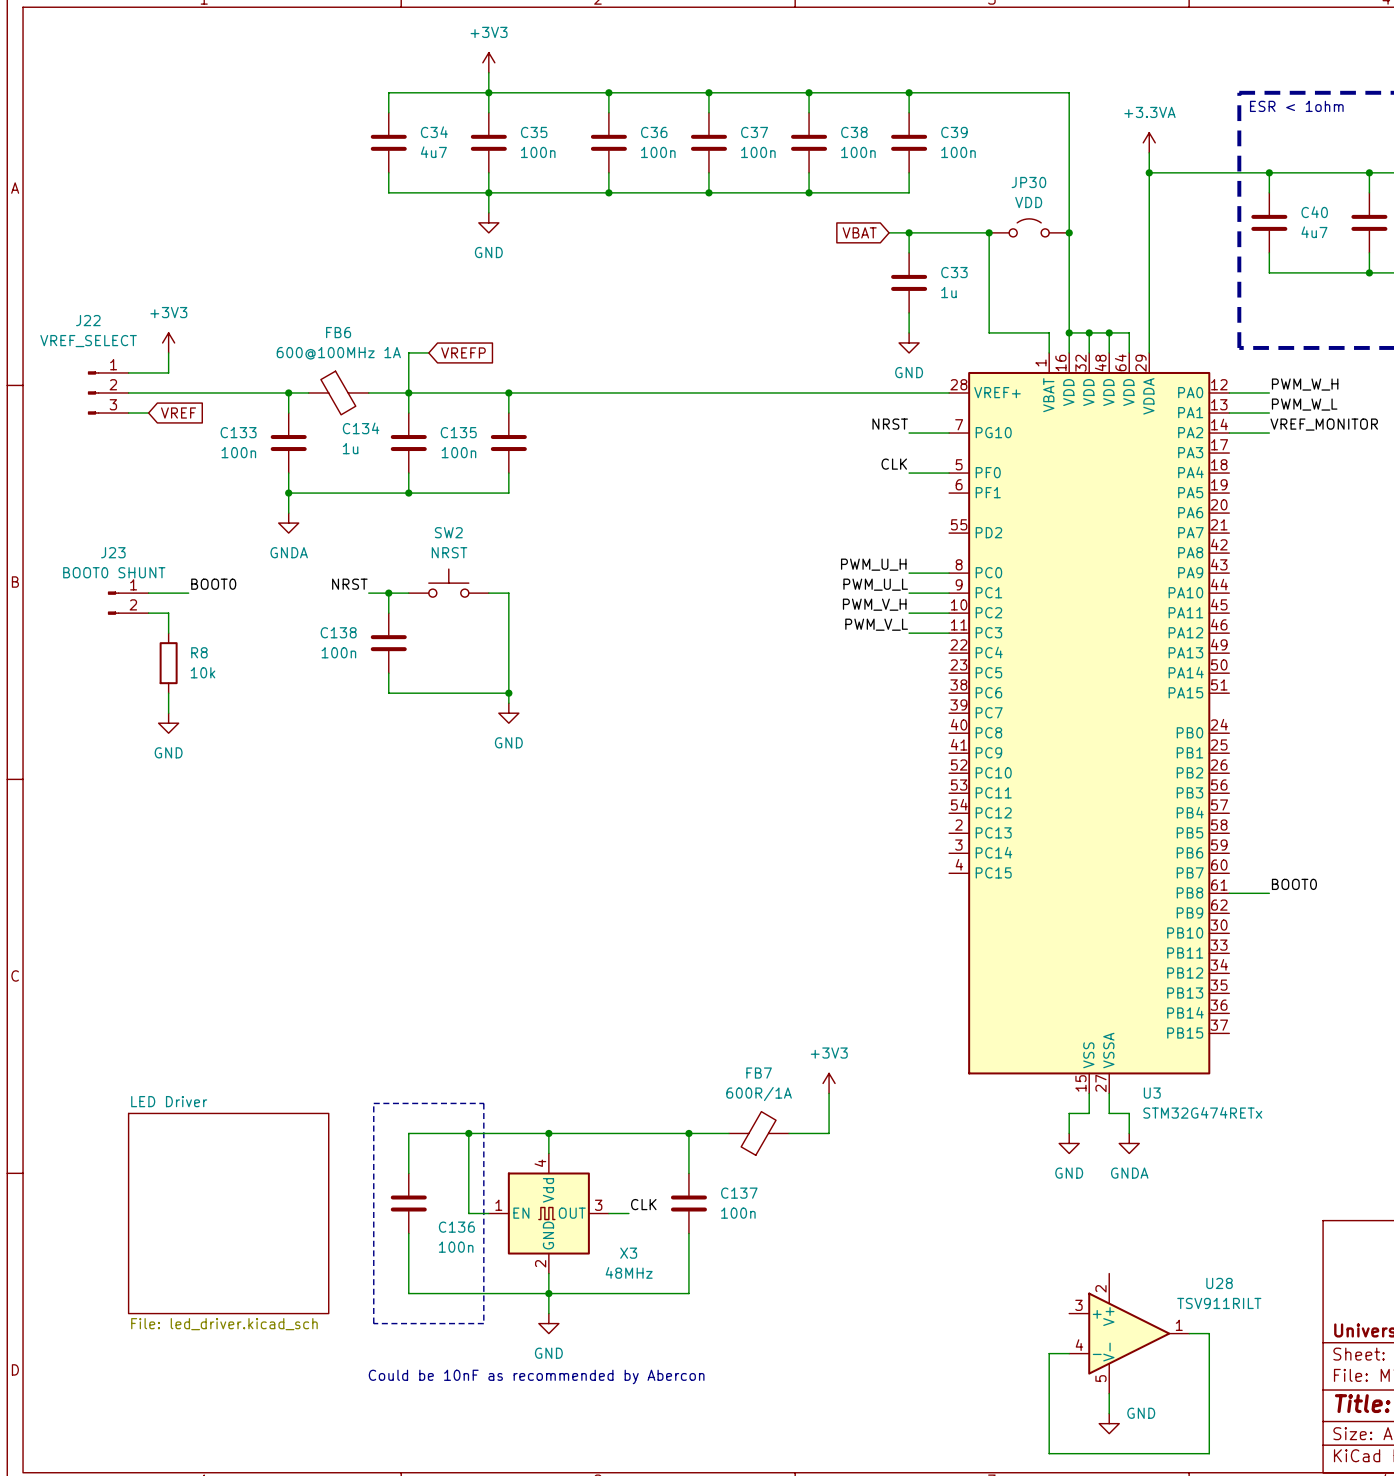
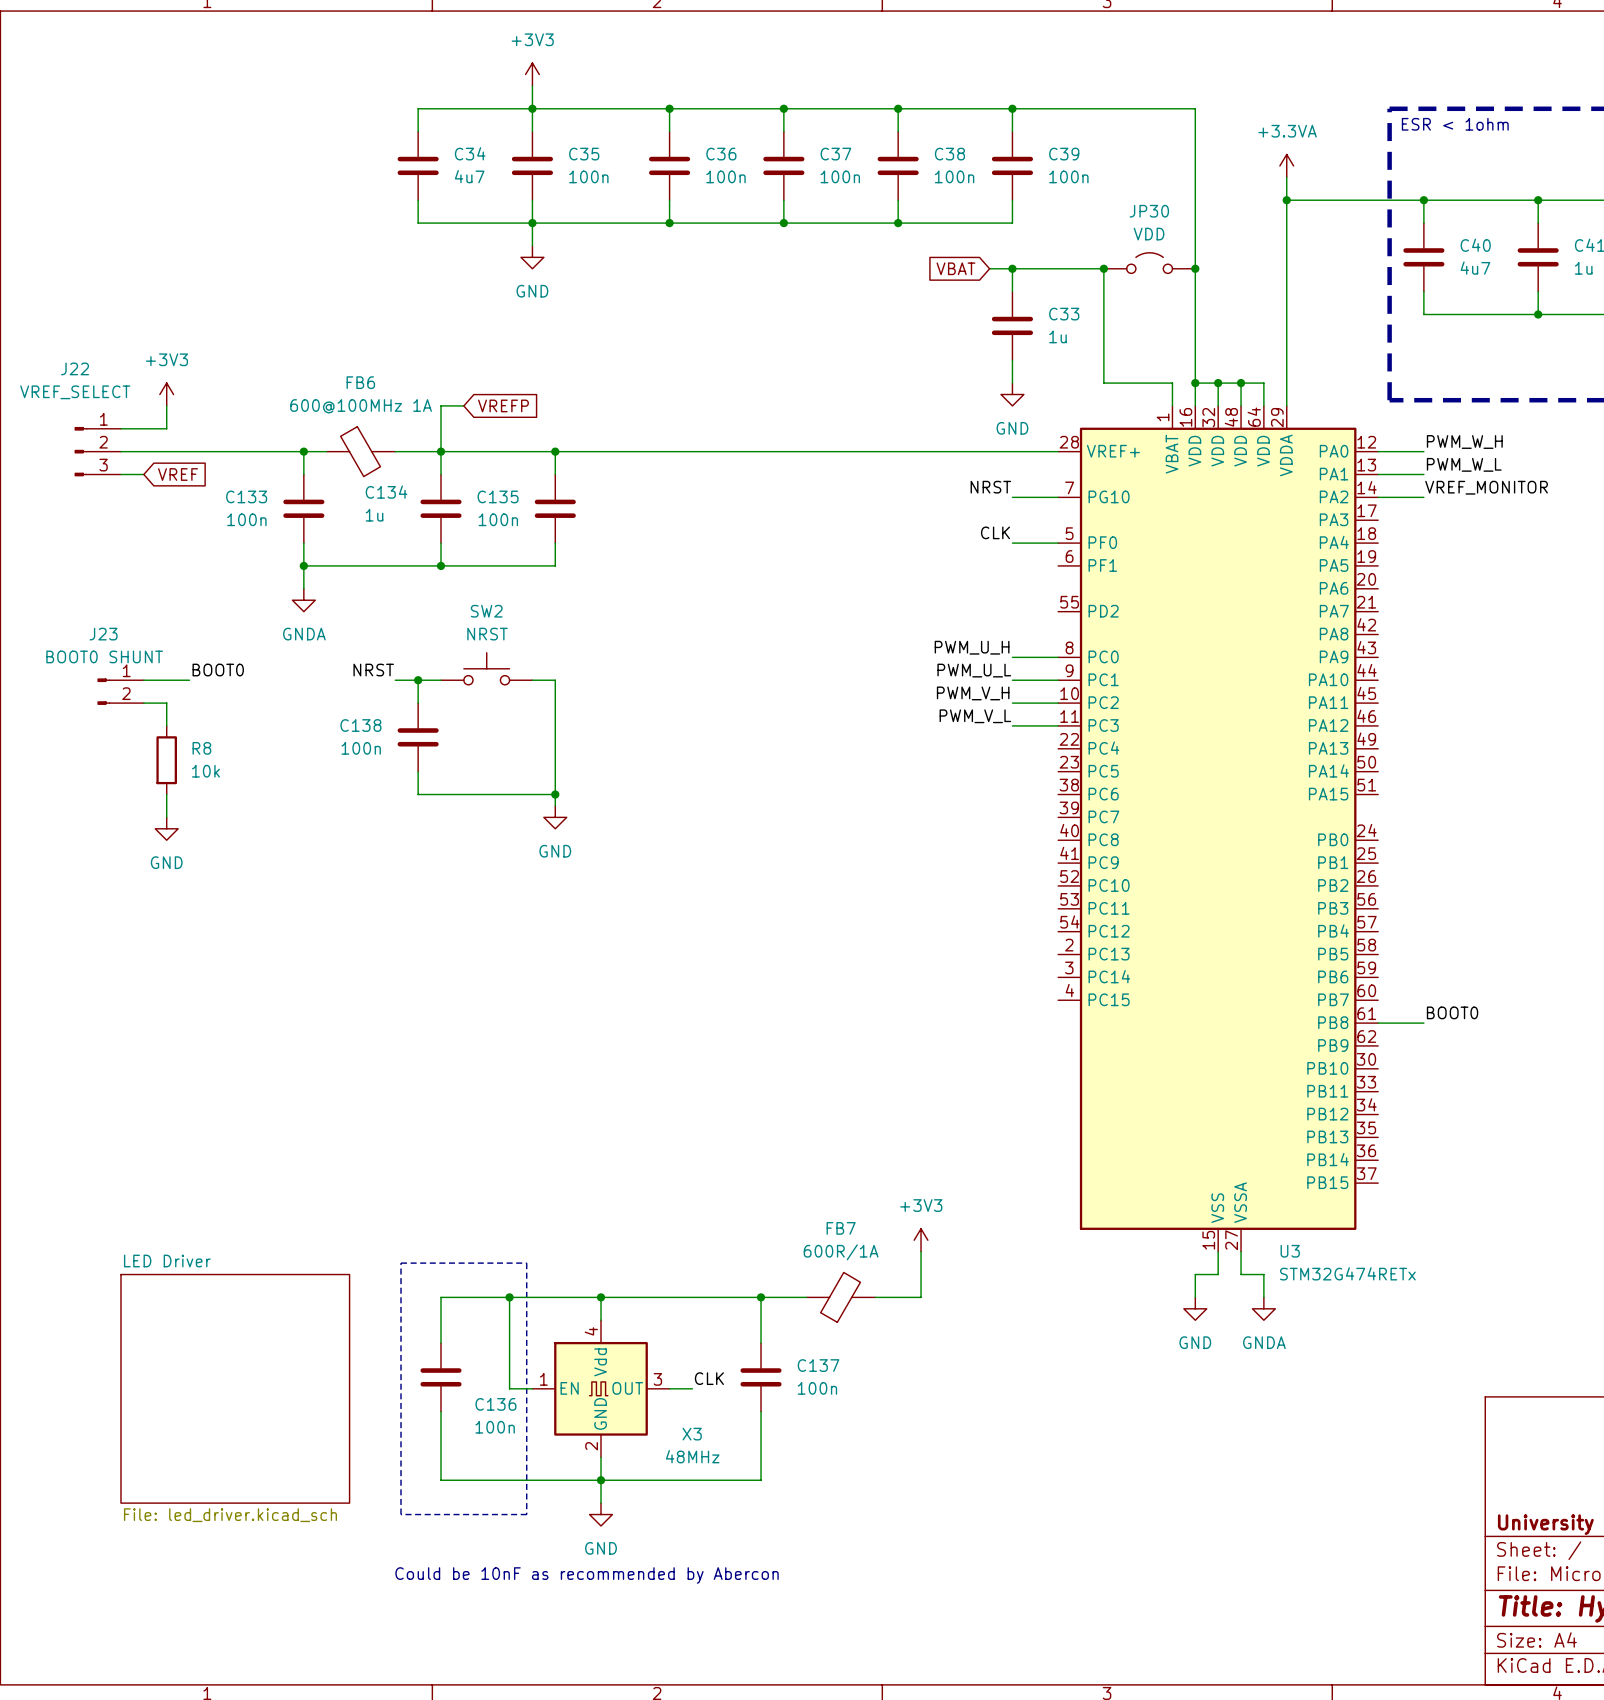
U28: TSV911RILT (1129, 1333) -> none
wire: (1189, 1333) (1209, 1333) (1209, 1453) (1049, 1453) (1049, 1353) (1069, 1353) -> none
wire: (1109, 1393) (1109, 1413) -> none
power symbol: GND (1109, 1423) -> none

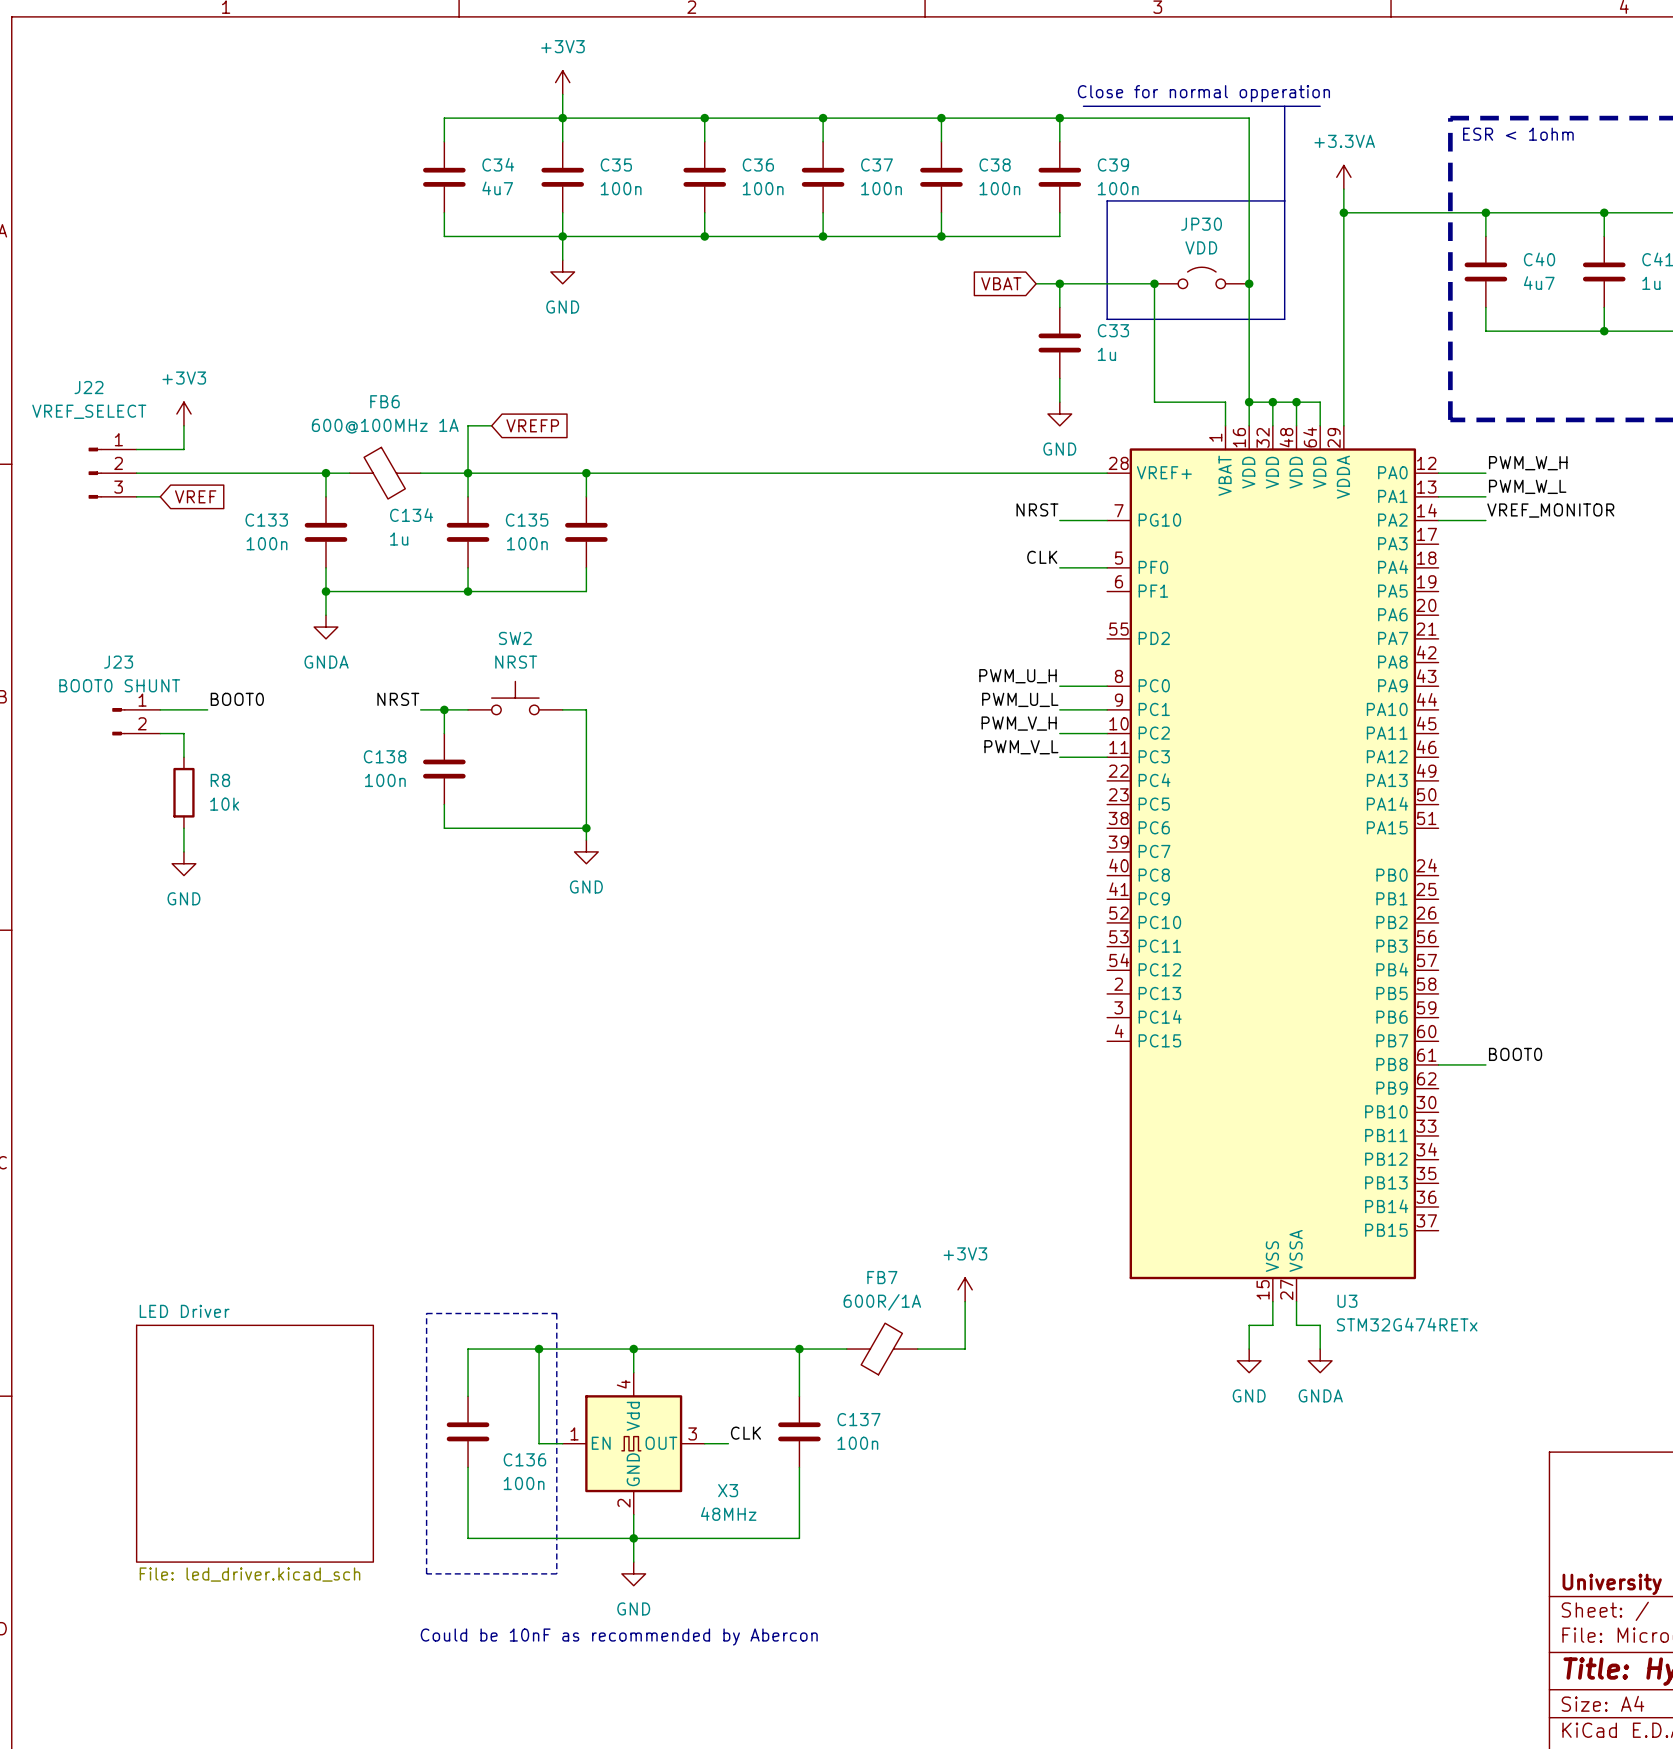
text: none -> Close for normal opperation (1203, 93)
line: none -> (1083, 106) (1320, 106)
line: none -> (1284, 106) (1284, 319) (1107, 319) (1107, 200) (1284, 200)

